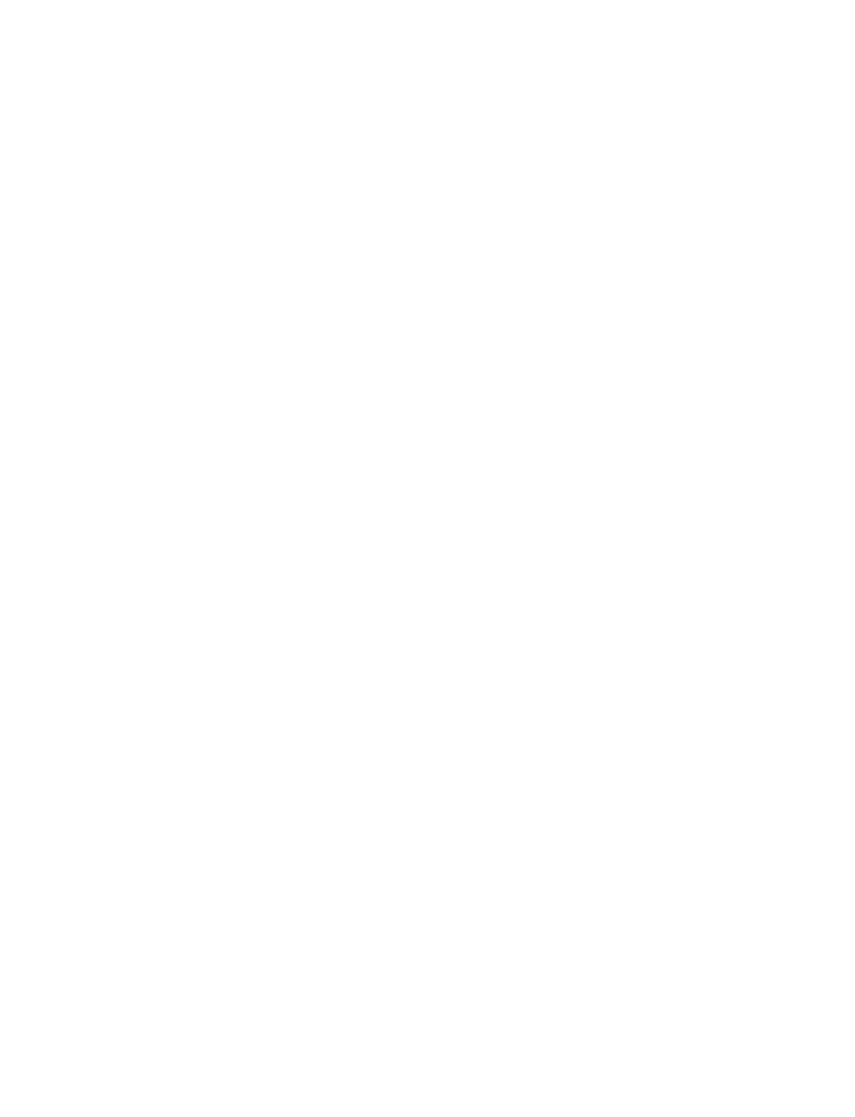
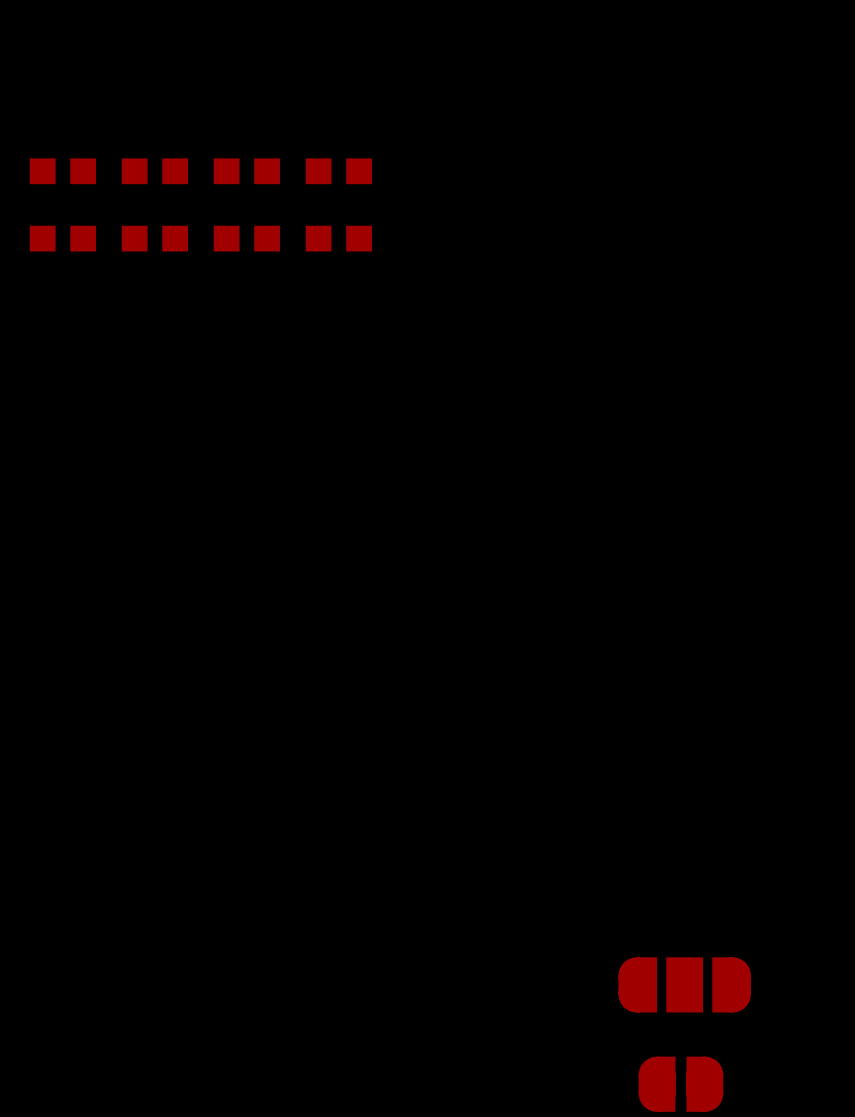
part: none -> (62, 204)
part: none -> (154, 204)
part: none -> (246, 204)
part: none -> (338, 204)
part: none -> (684, 984)
part: none -> (680, 1084)

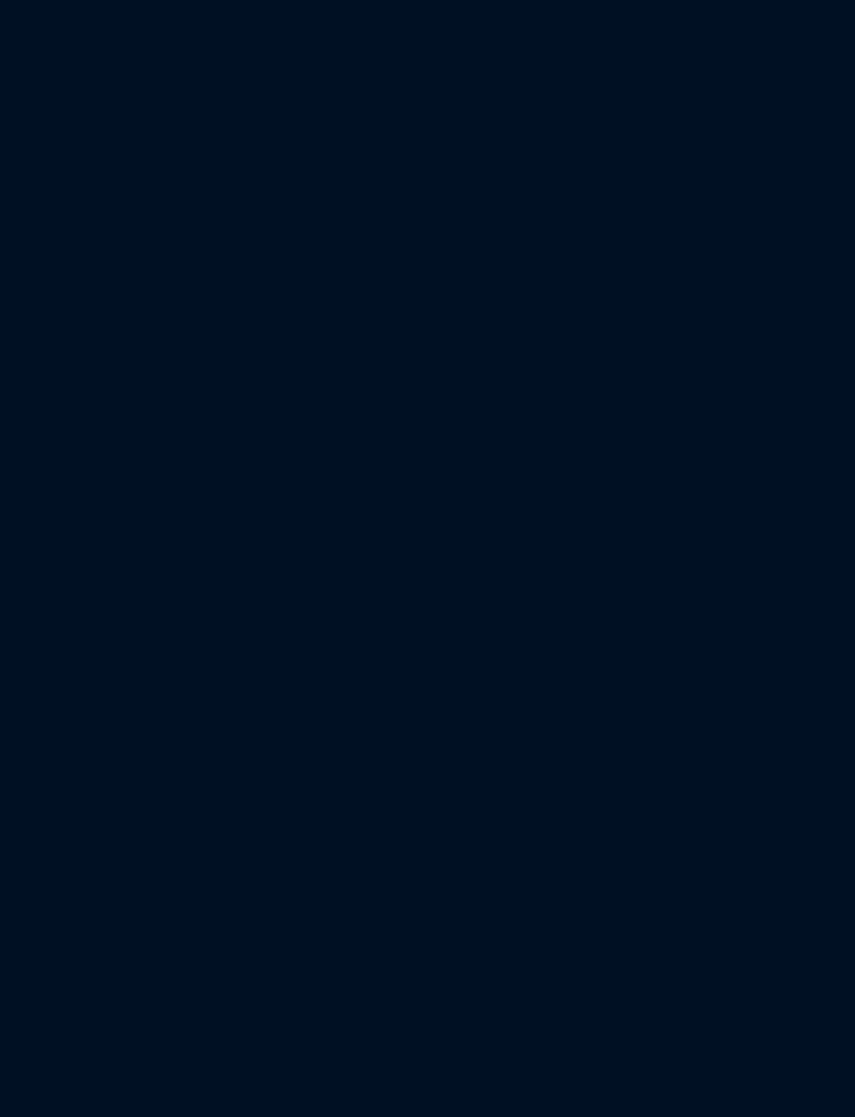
part: (62, 204) -> none
part: (154, 204) -> none
part: (246, 204) -> none
part: (338, 204) -> none
part: (684, 984) -> none
part: (680, 1084) -> none

